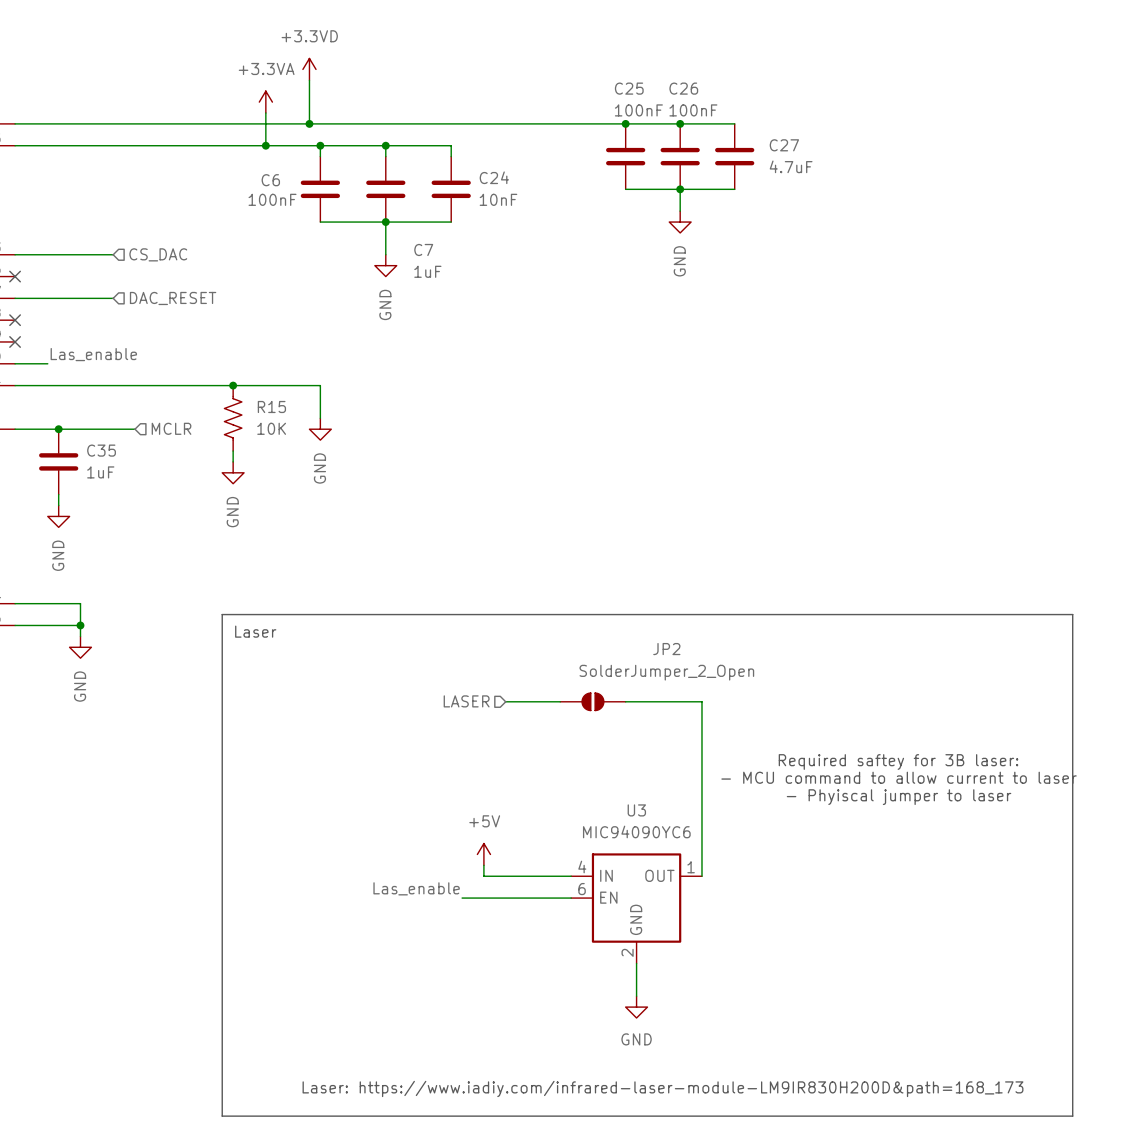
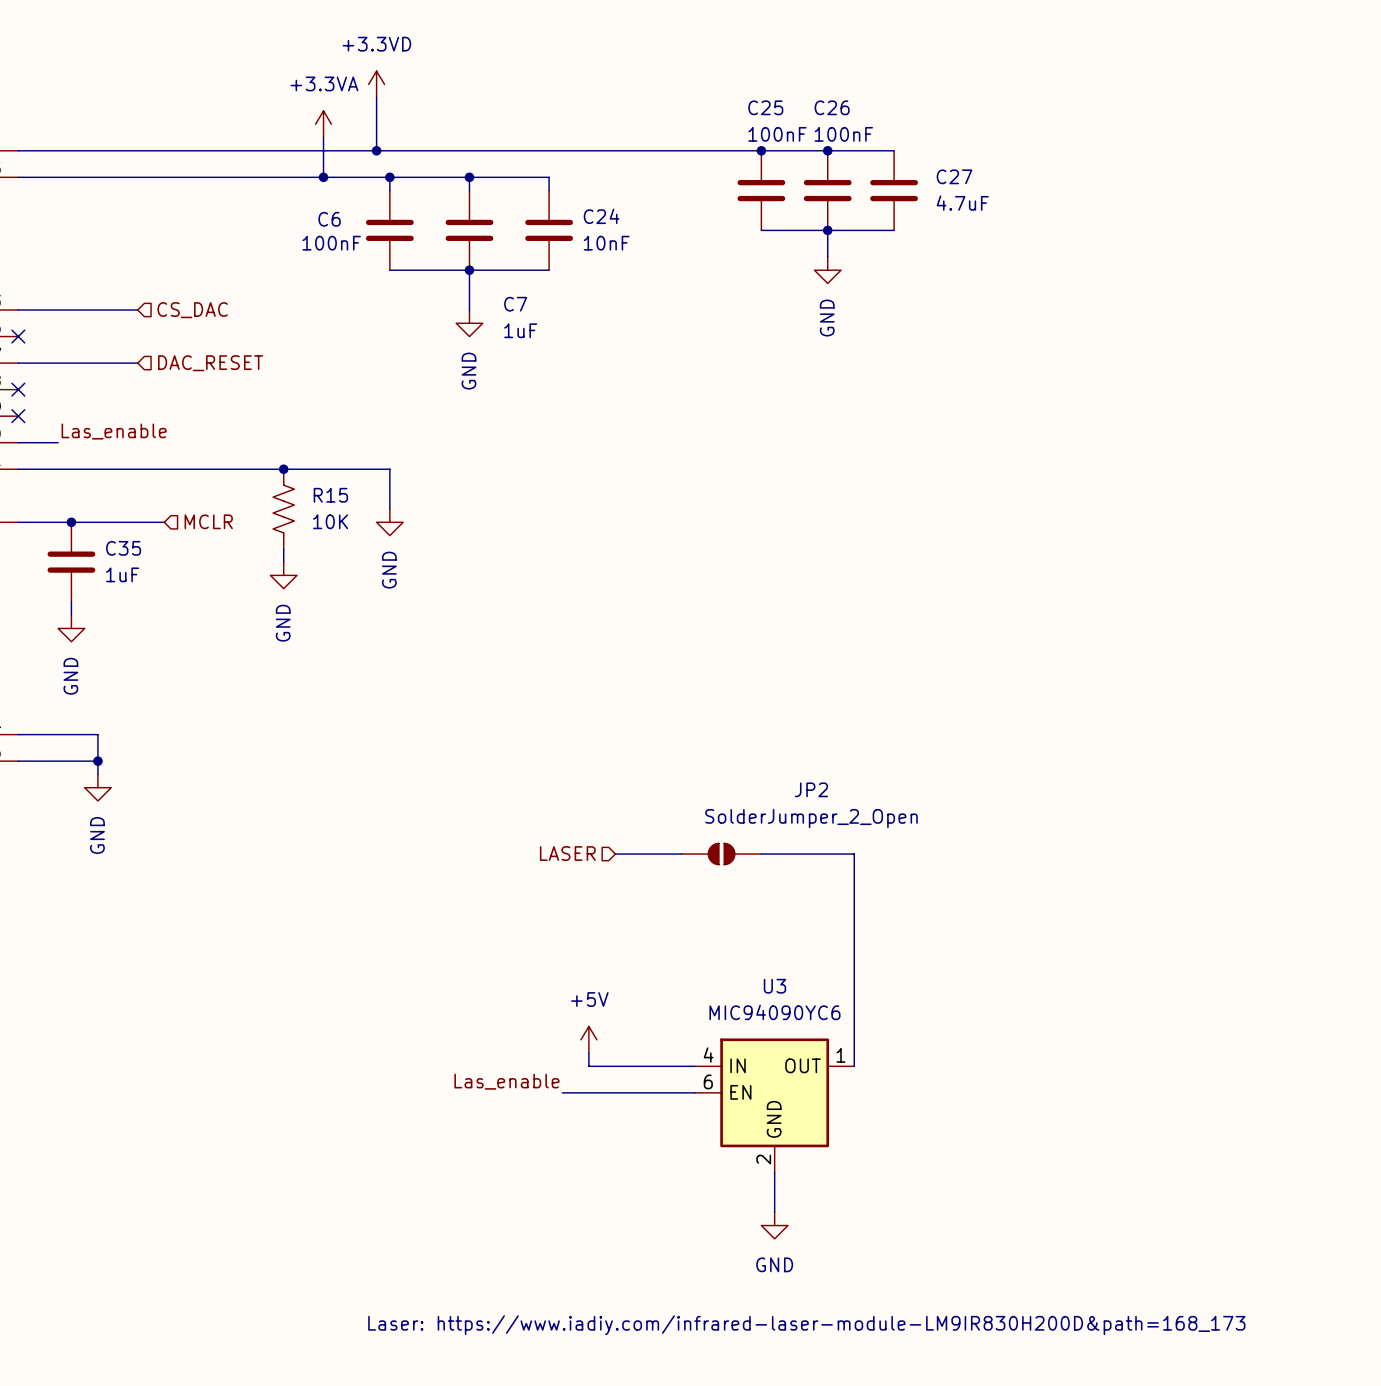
line: (222, 614) (1072, 614) (1072, 1116) (222, 1116) (222, 614) -> none
text: Laser (255, 631) -> none
text: Required saftey for 3B laser: (898, 762) -> none
text: - MCU command to allow current to laser (899, 777) -> none
text: - Phyiscal jumper to laser (899, 797) -> none

